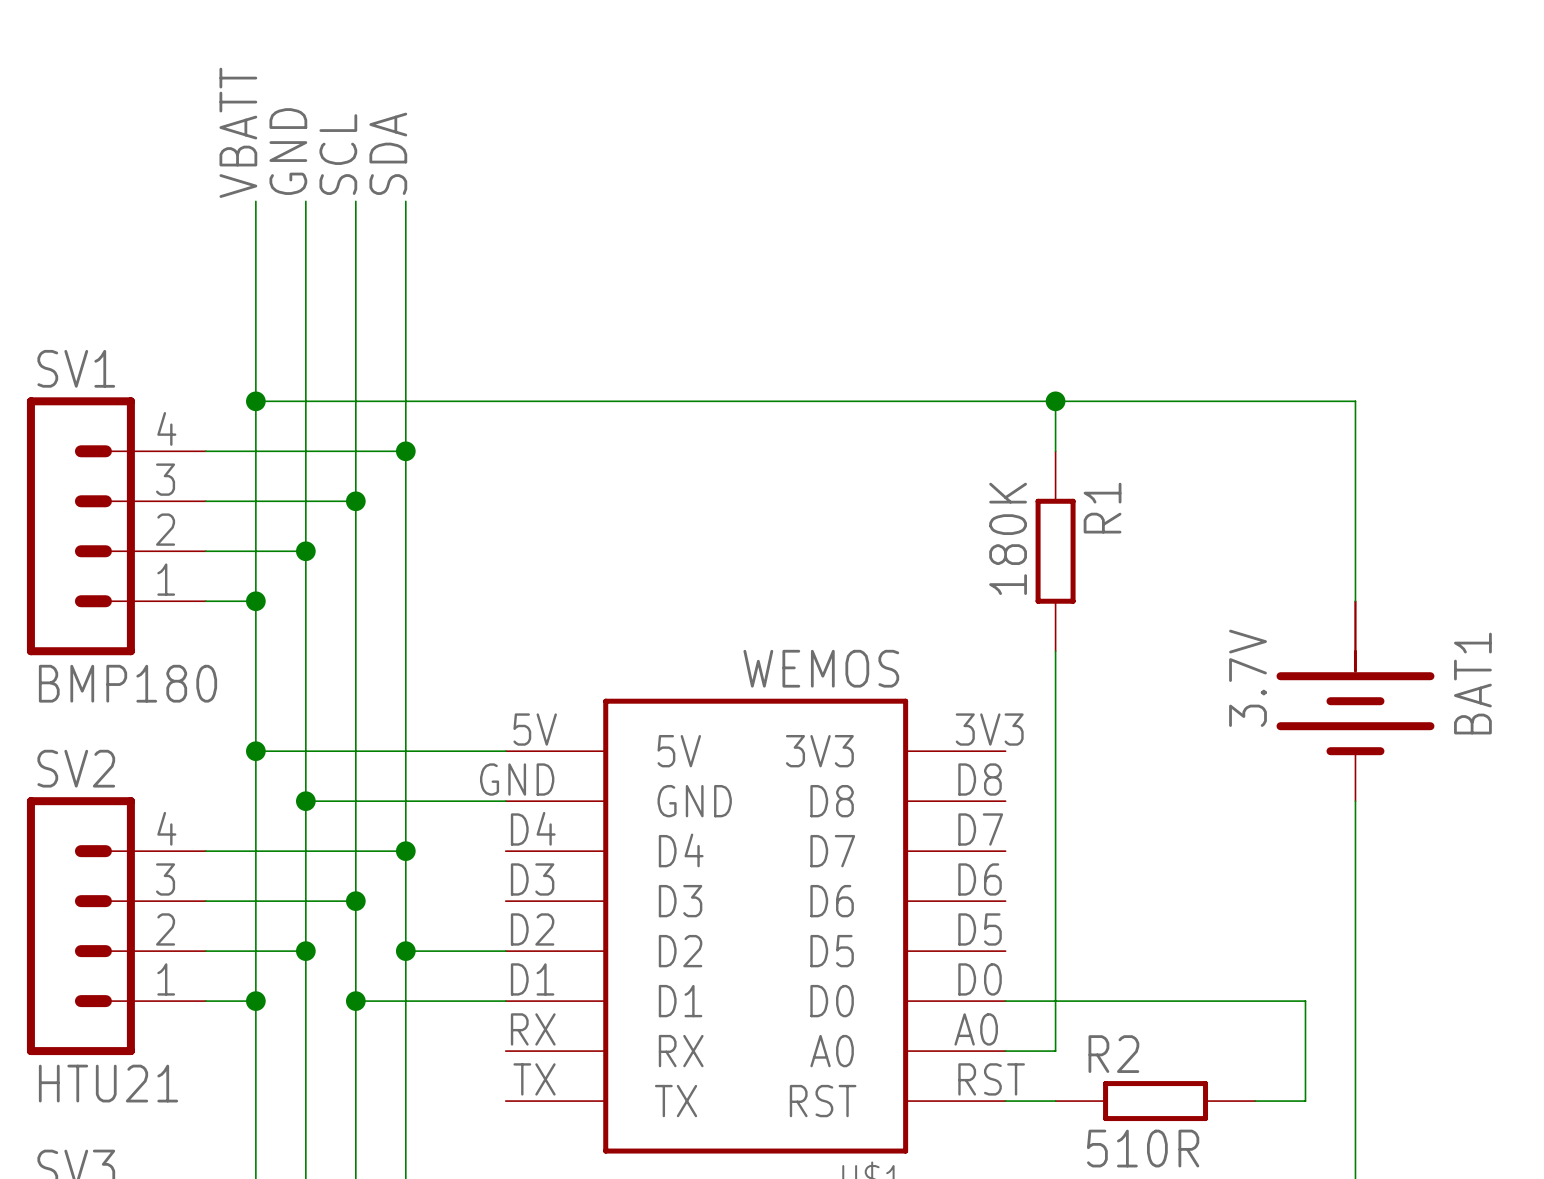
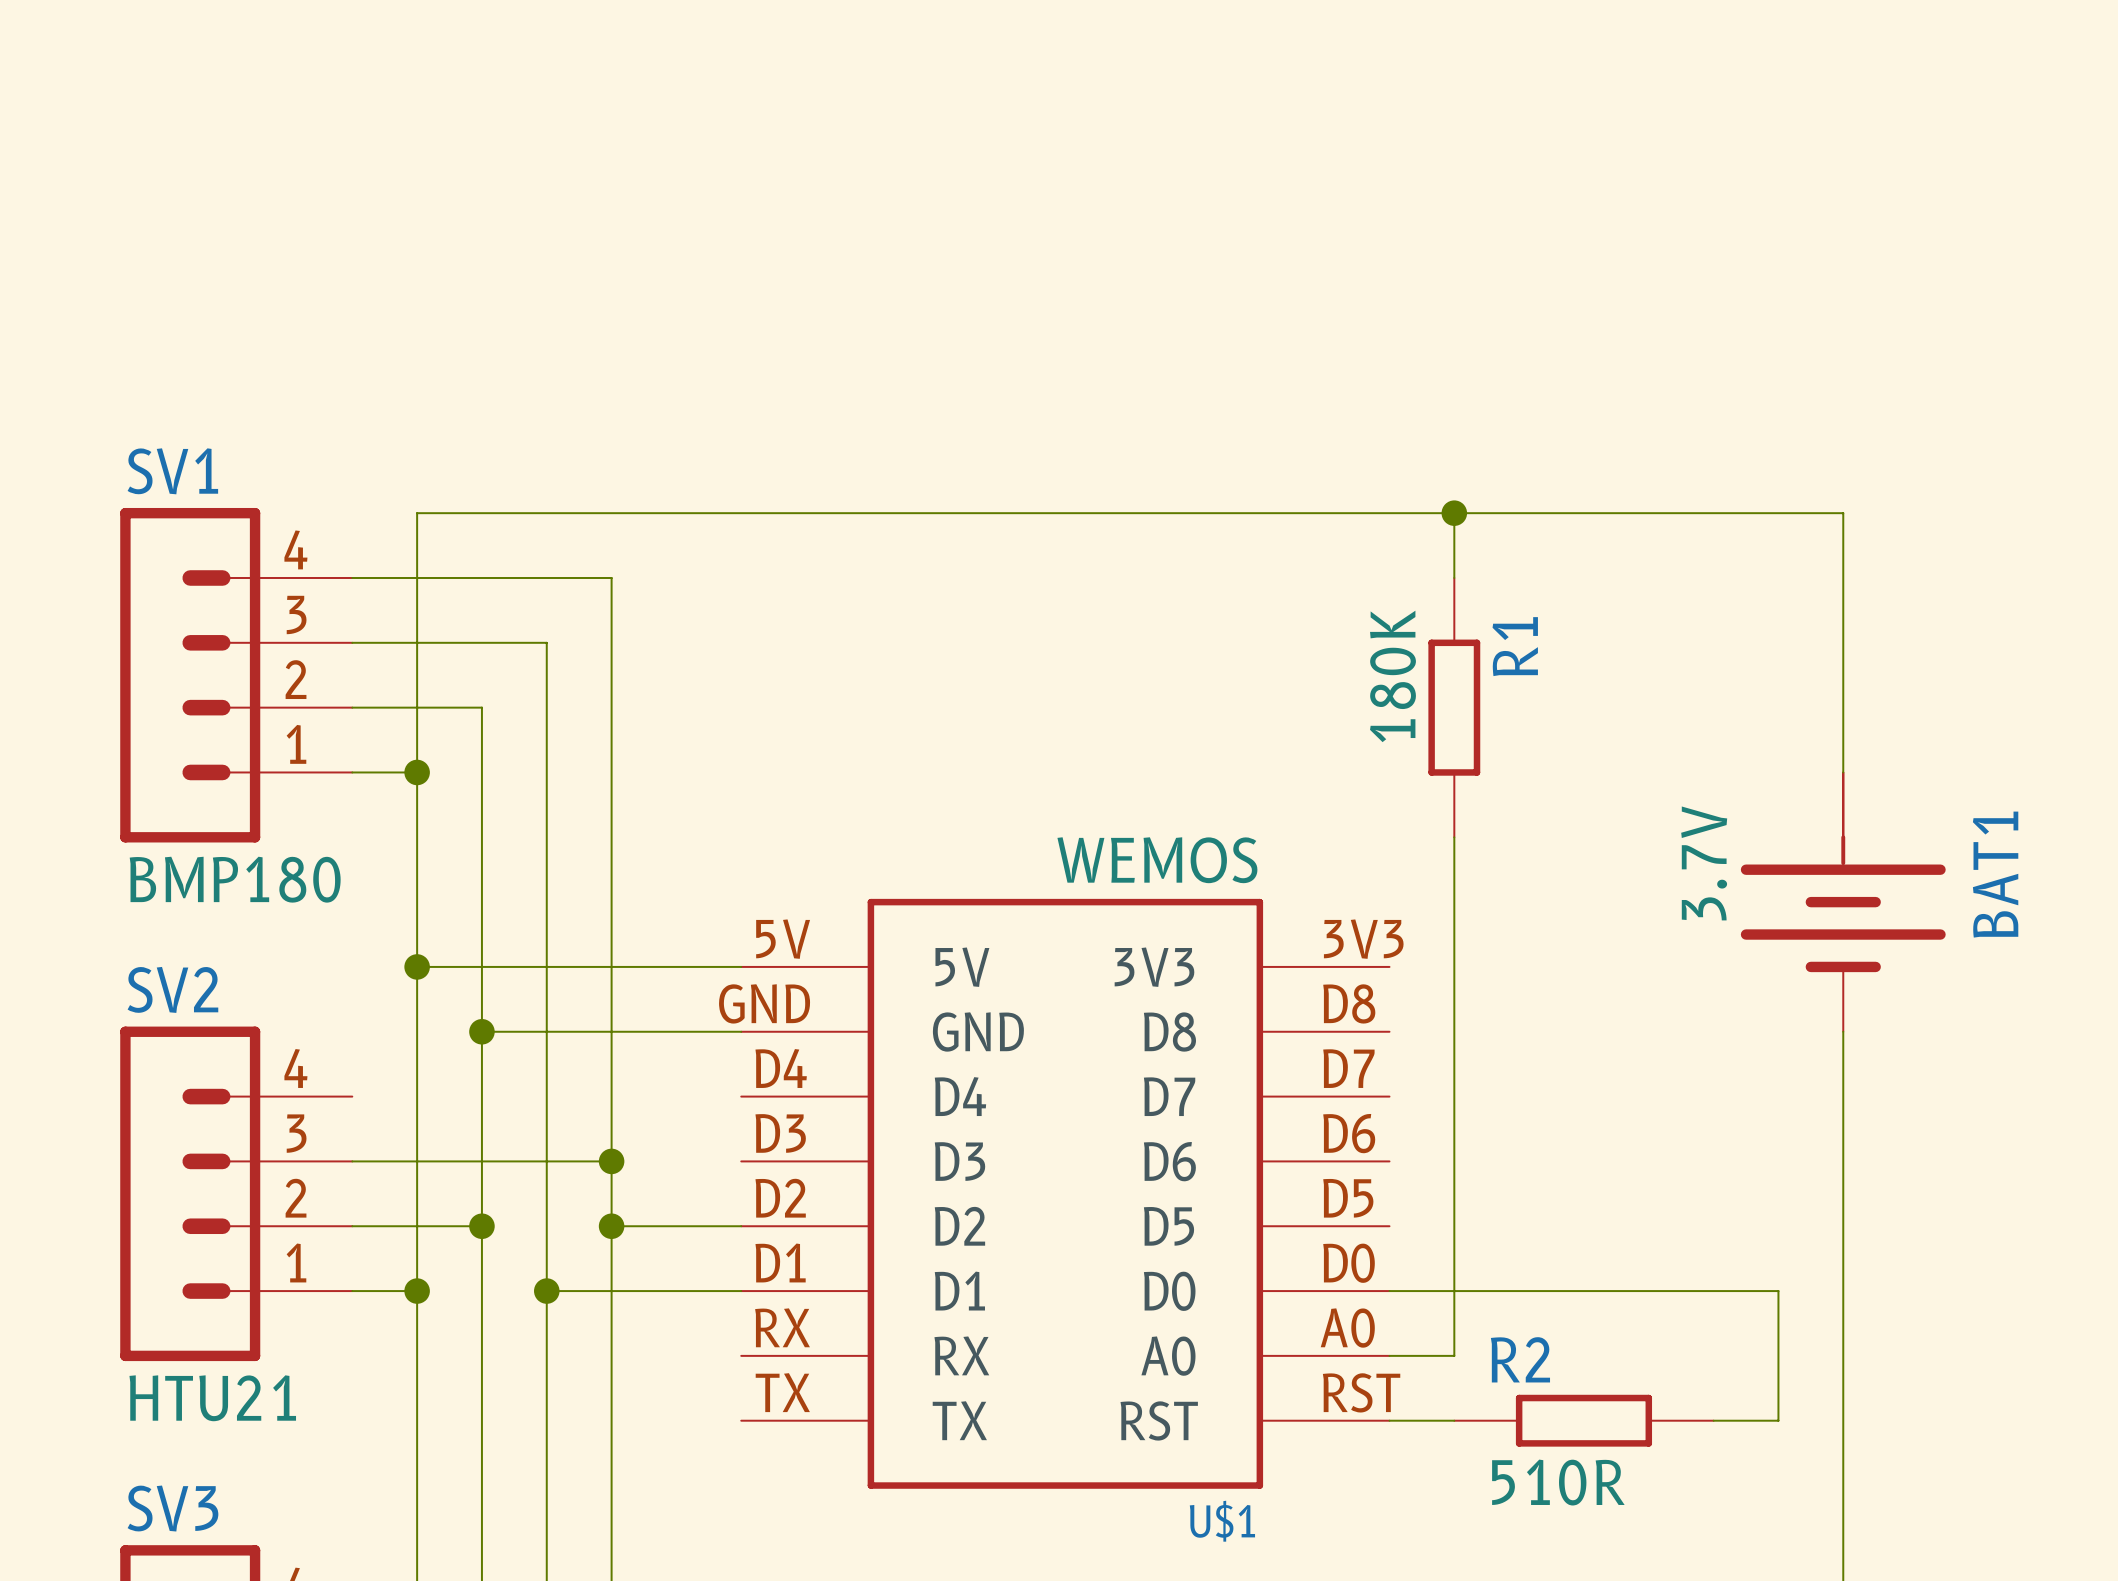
label: VBATT (238, 132) -> none
label: GND (288, 151) -> none
label: SDA (388, 153) -> none
label: SCL (338, 154) -> none
wire: (255, 201) (255, 401) -> none
wire: (305, 201) (305, 551) -> none
wire: (355, 201) (355, 501) -> none
wire: (405, 201) (405, 451) -> none
junction: (255, 401) -> none
junction: (405, 451) -> none
junction: (355, 501) -> none
junction: (305, 551) -> none
wire: (205, 851) (405, 851) -> none
junction: (405, 851) -> none
wire: none -> (546, 1161) (611, 1161)
junction: (355, 901) -> none
junction: none -> (611, 1161)

